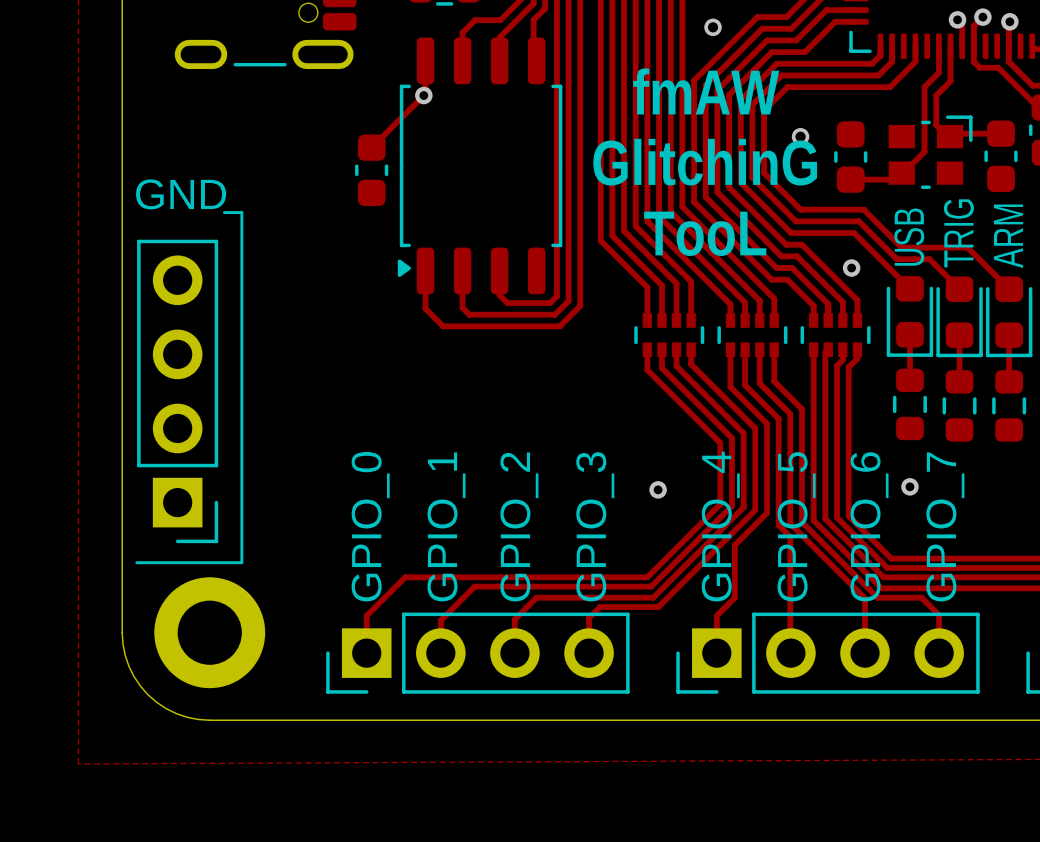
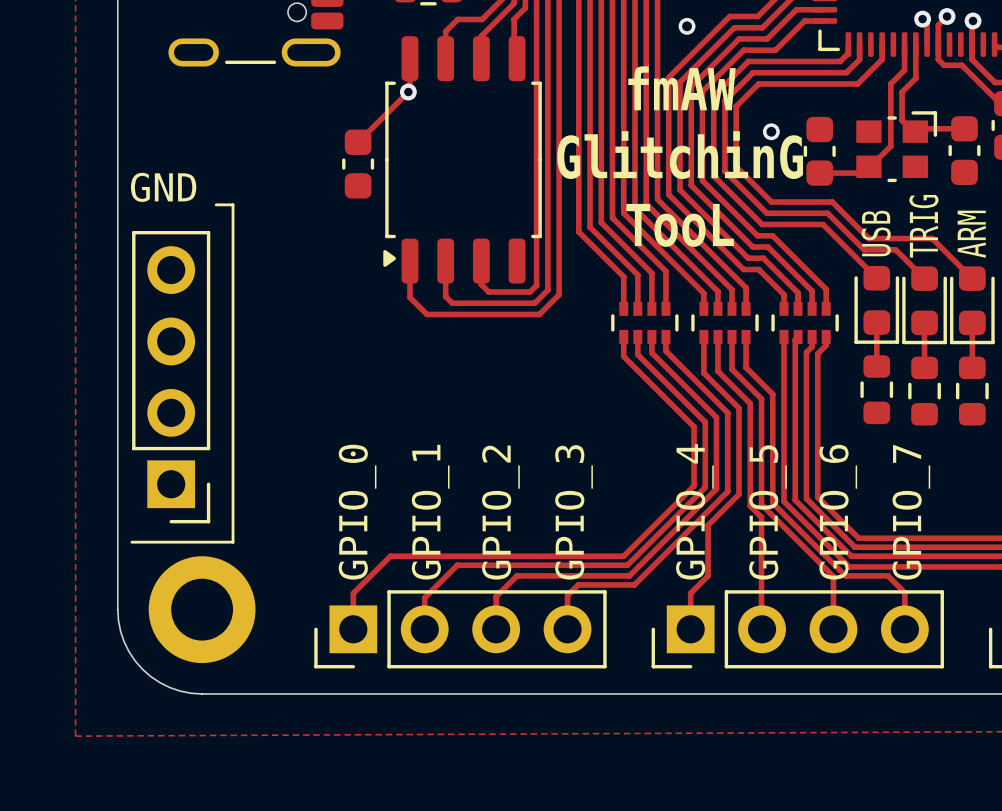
via: (851, 268) -> none
via: (909, 486) -> none
via: (658, 489) -> none

